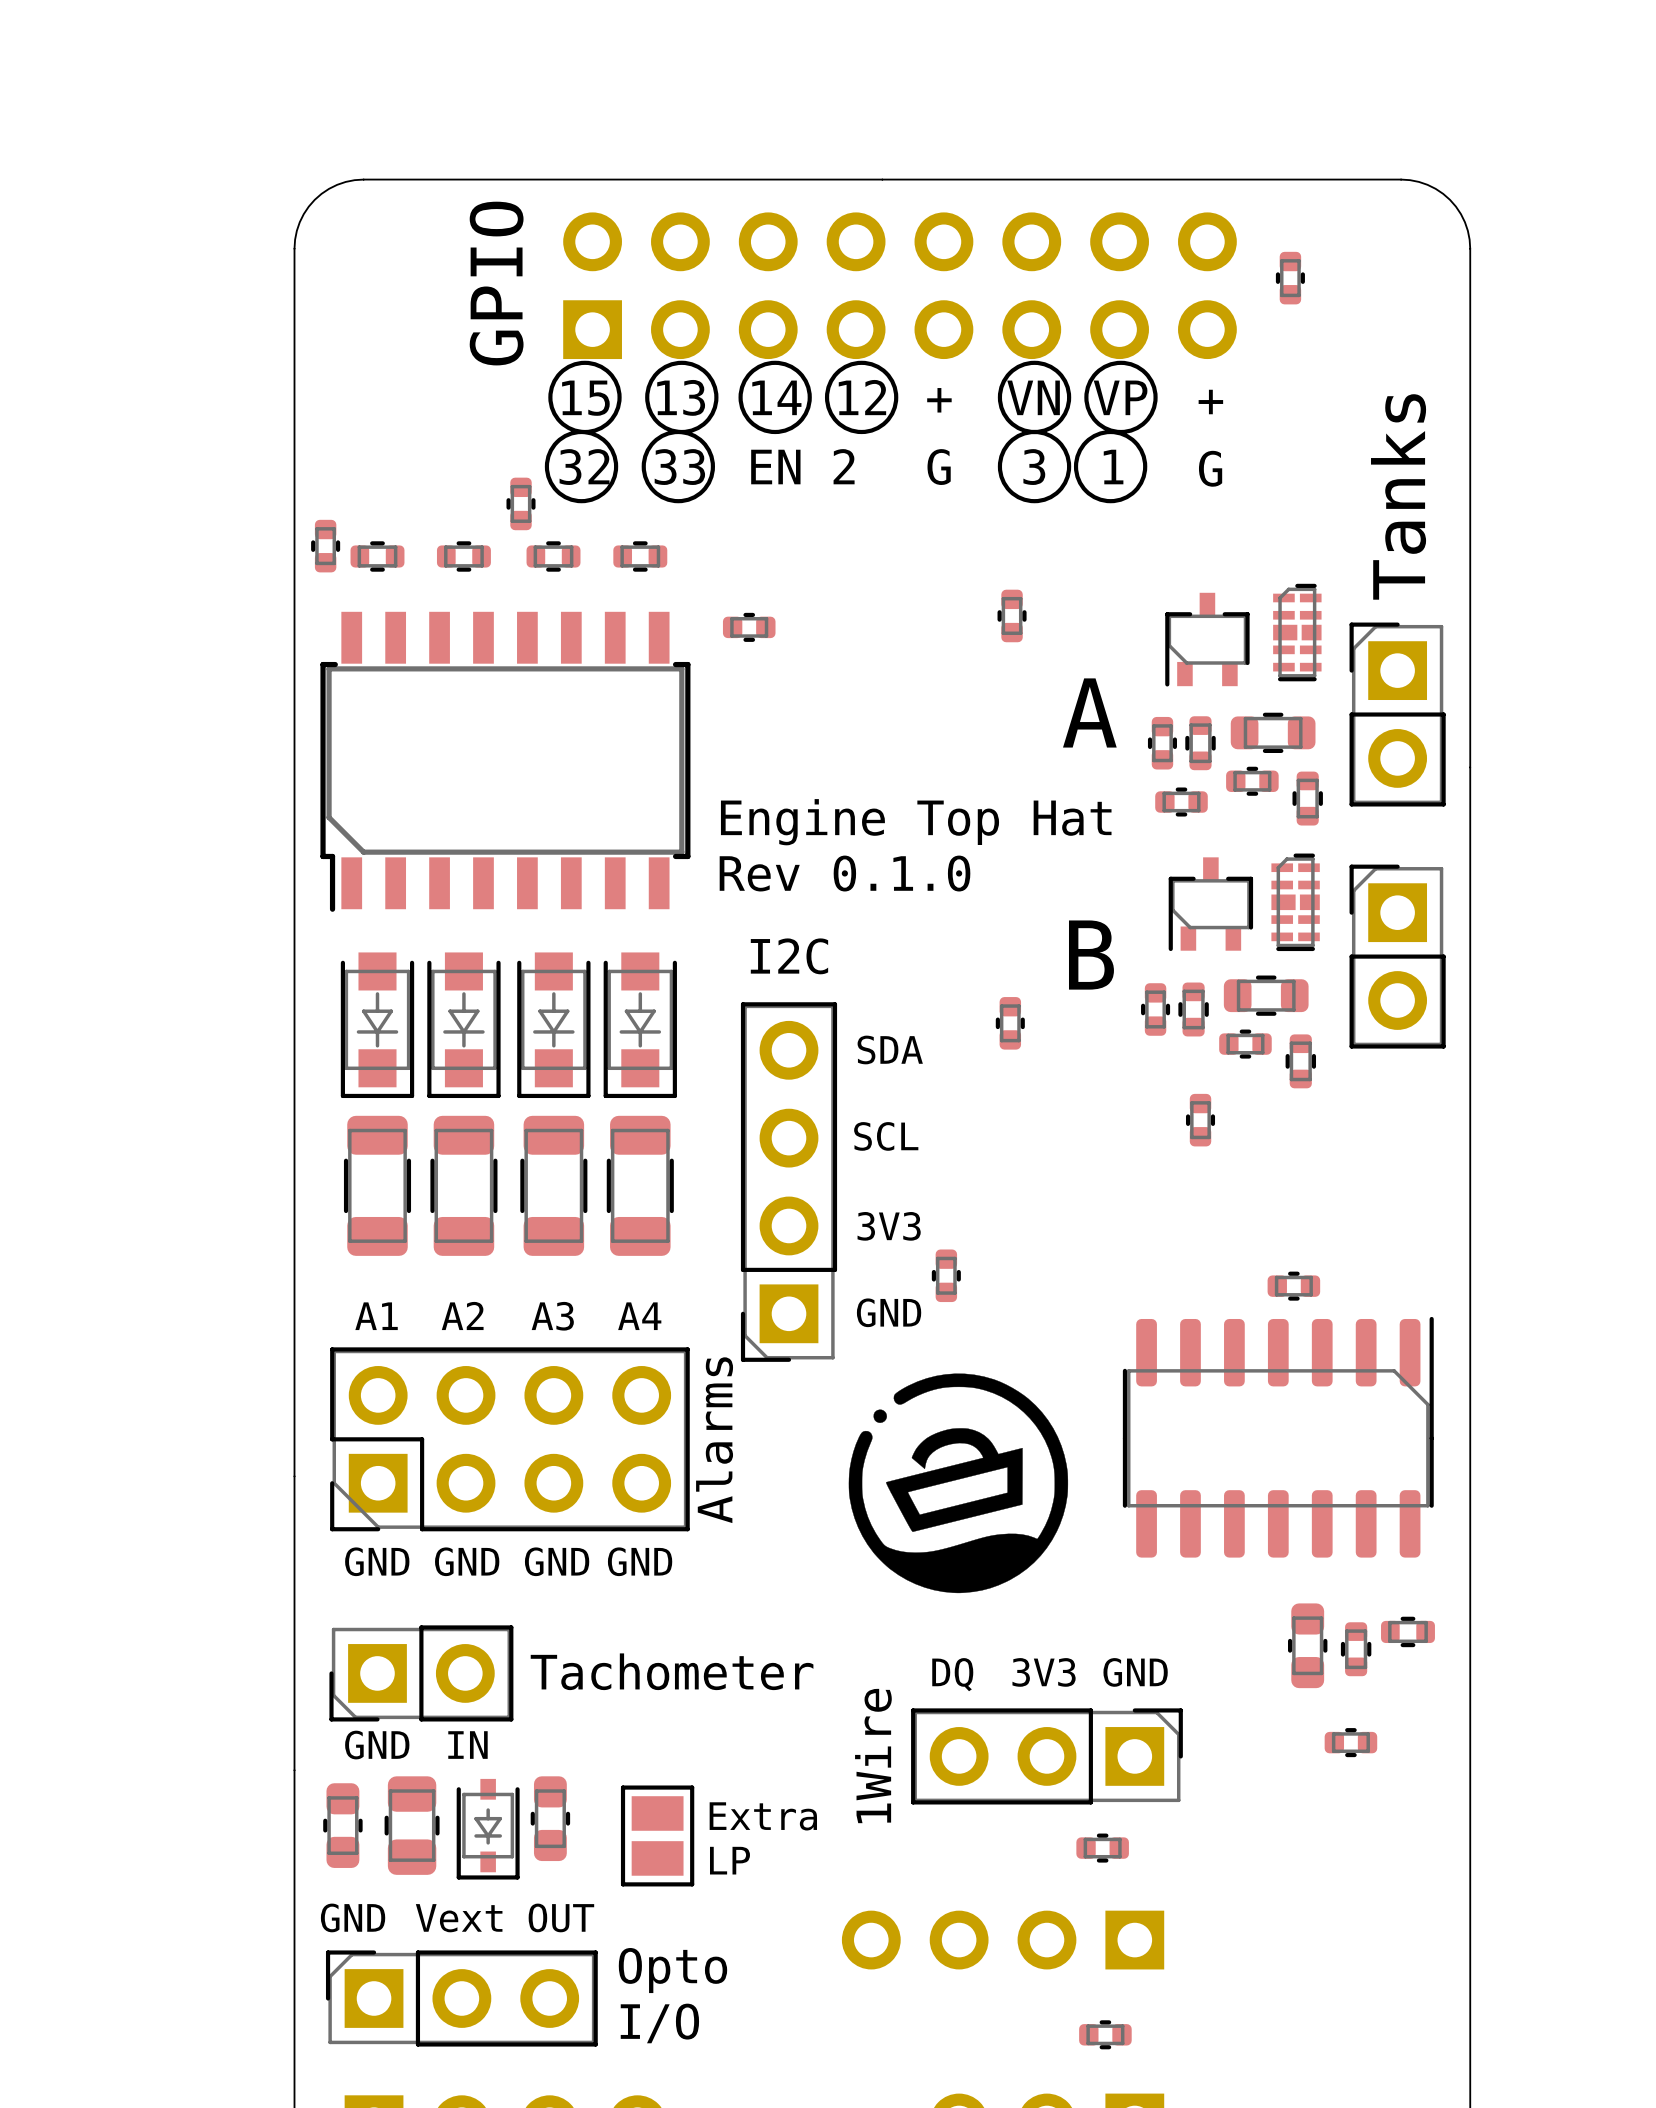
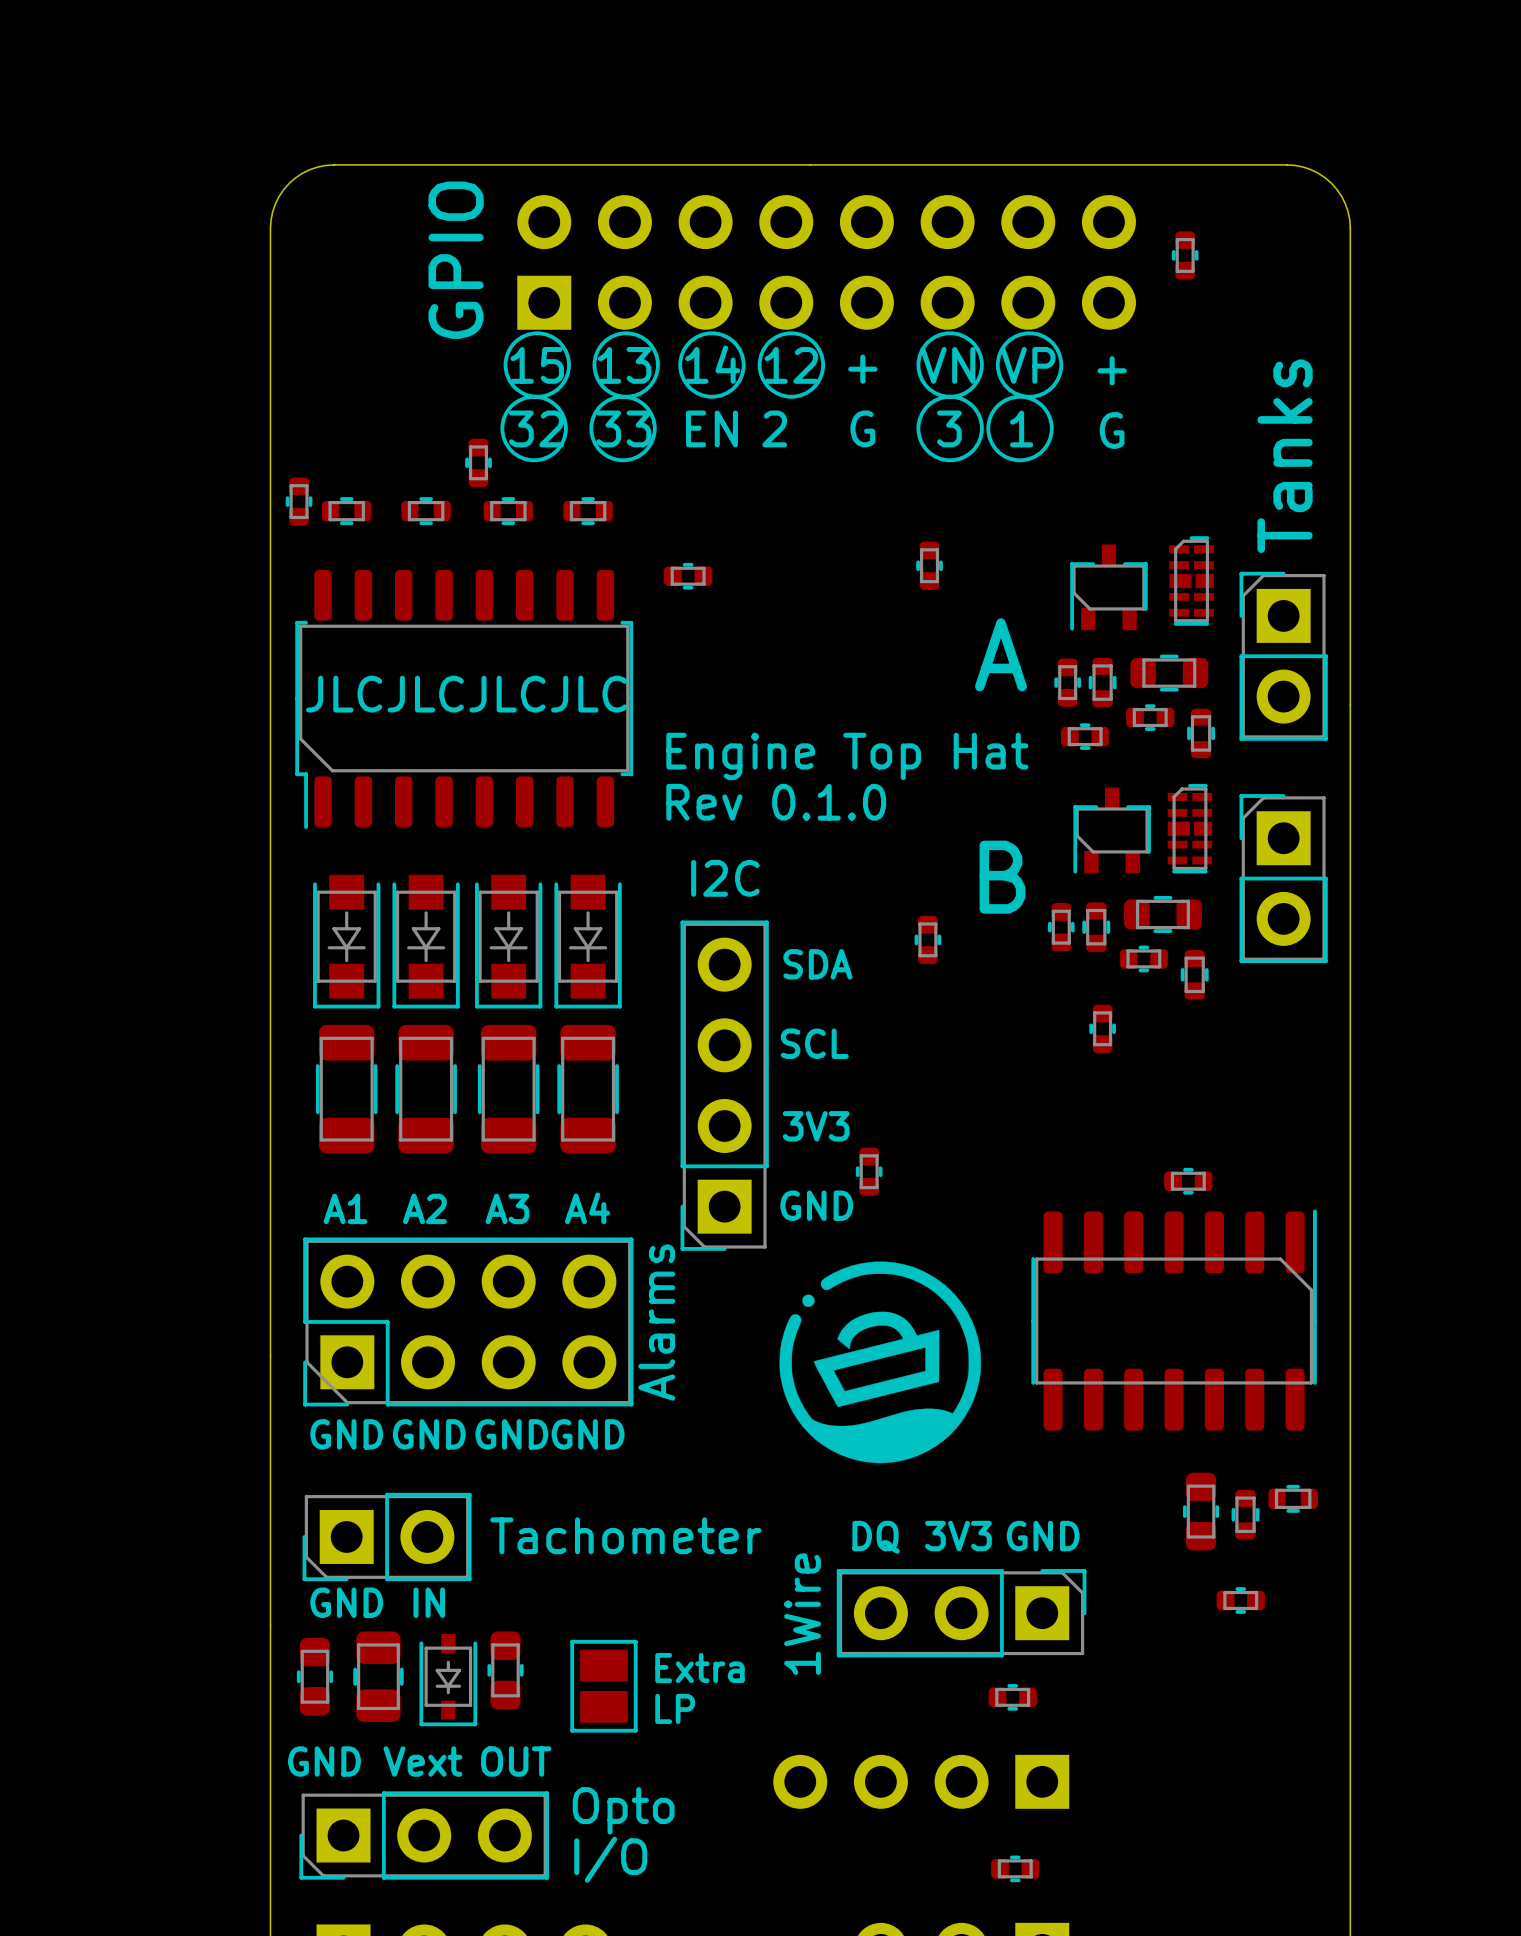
part footprint: [320, 611, 691, 912] -> [295, 569, 634, 830]
text: none -> JLCJLCJLCJLC (466, 694)
part footprint: [325, 1950, 598, 2047] -> [299, 1791, 550, 1880]

